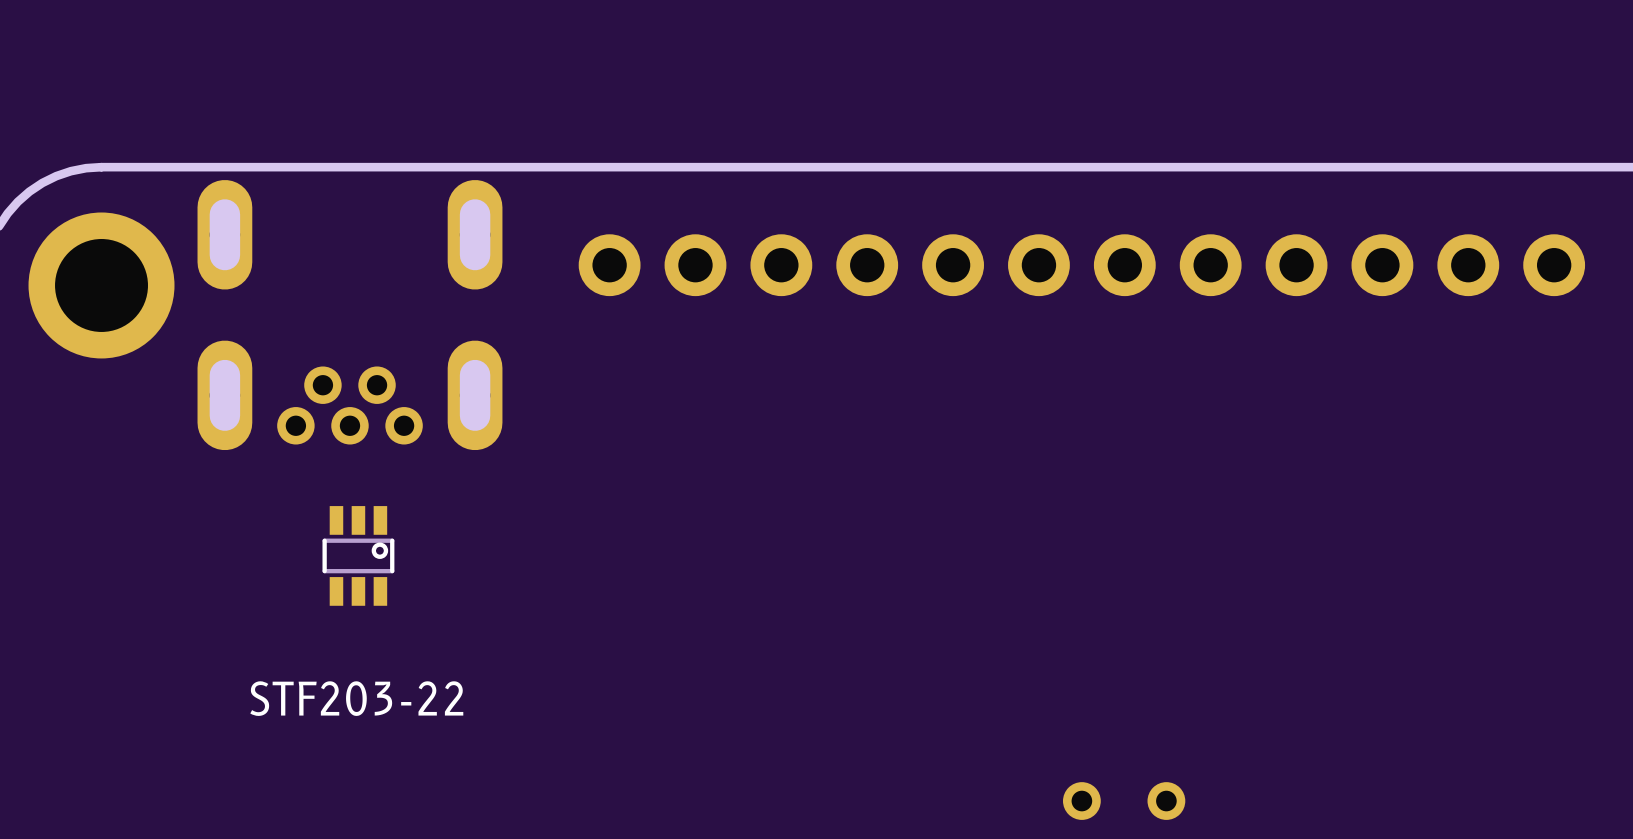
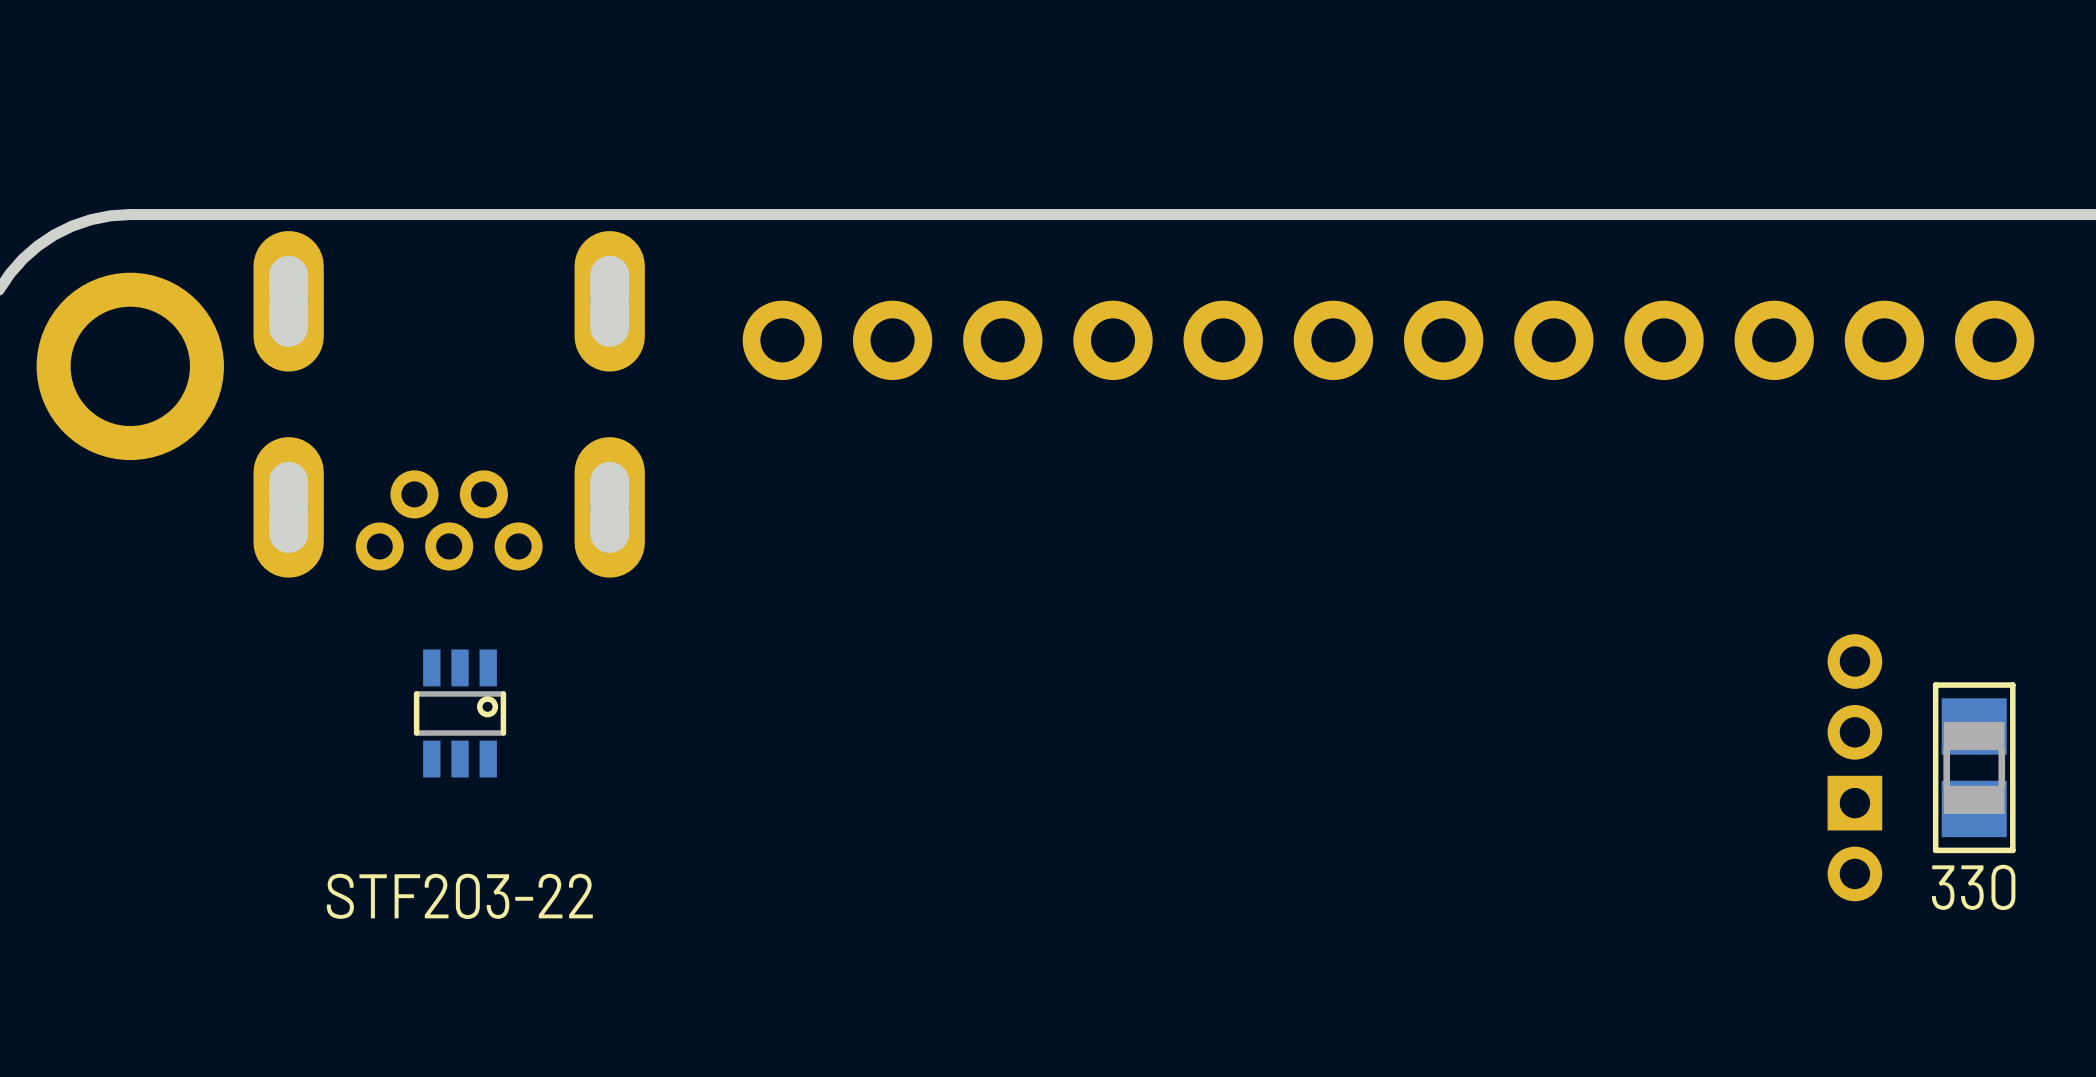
part: none -> (1854, 767)
part: none -> 330 (1974, 767)
part: (1124, 801) -> none

